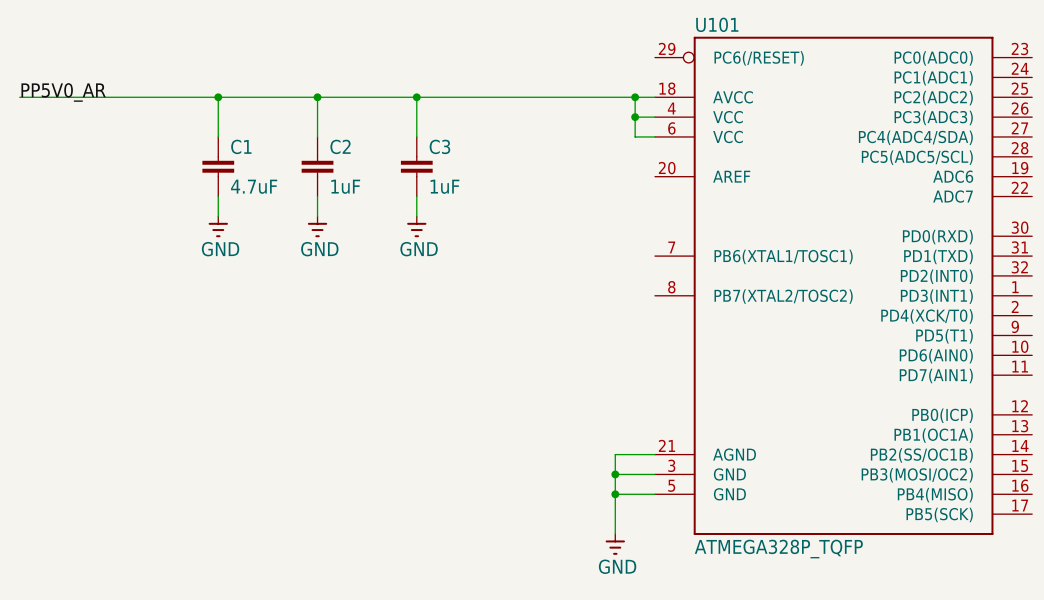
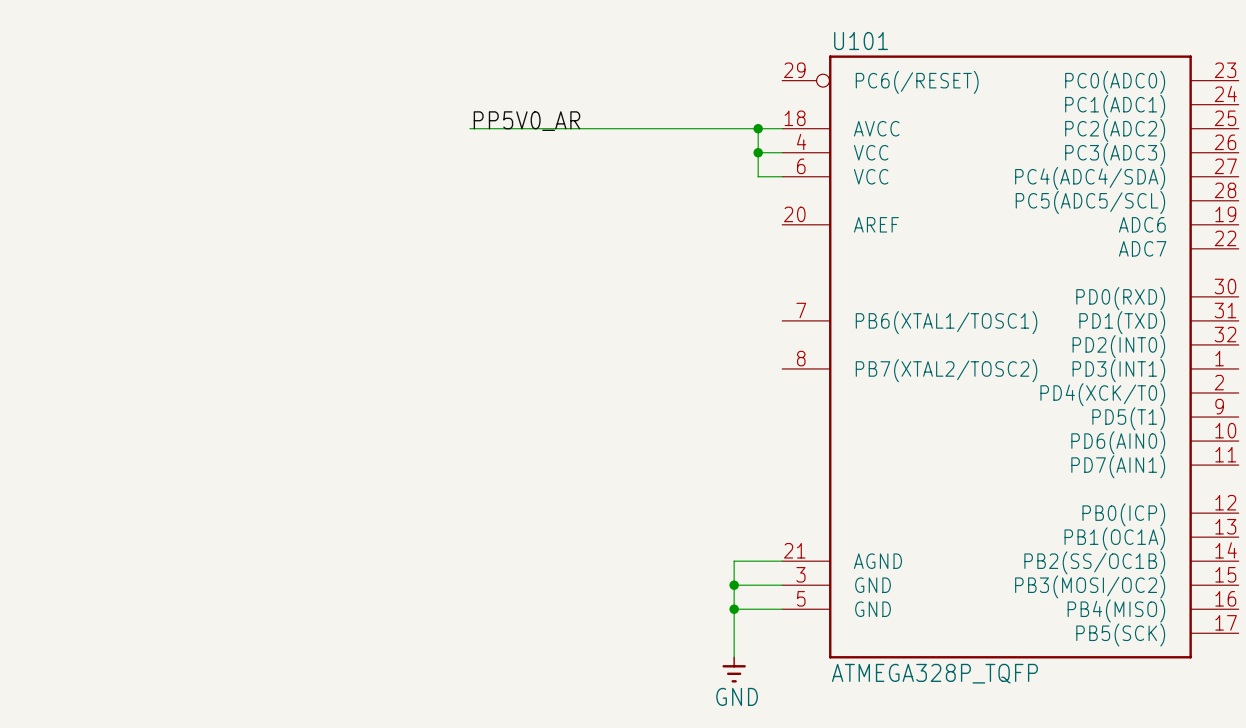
label: PP5V0_AR (63, 92) -> none
label: none -> PP5V0_AR (526, 121)
wire: (19, 97) (396, 97) -> none
wire: (218, 97) (218, 136) -> none
junction: (218, 97) -> none
wire: (317, 97) (317, 136) -> none
junction: (317, 97) -> none
wire: (416, 97) (416, 136) -> none
junction: (416, 97) -> none
C1: 4.7uF (218, 166) -> none
C2: 1uF (317, 166) -> none
C3: 1uF (416, 166) -> none
wire: (218, 196) (218, 216) -> none
wire: (317, 196) (317, 216) -> none
wire: (416, 196) (416, 216) -> none
power symbol: GND (218, 226) -> none
power symbol: GND (317, 226) -> none
power symbol: GND (416, 226) -> none

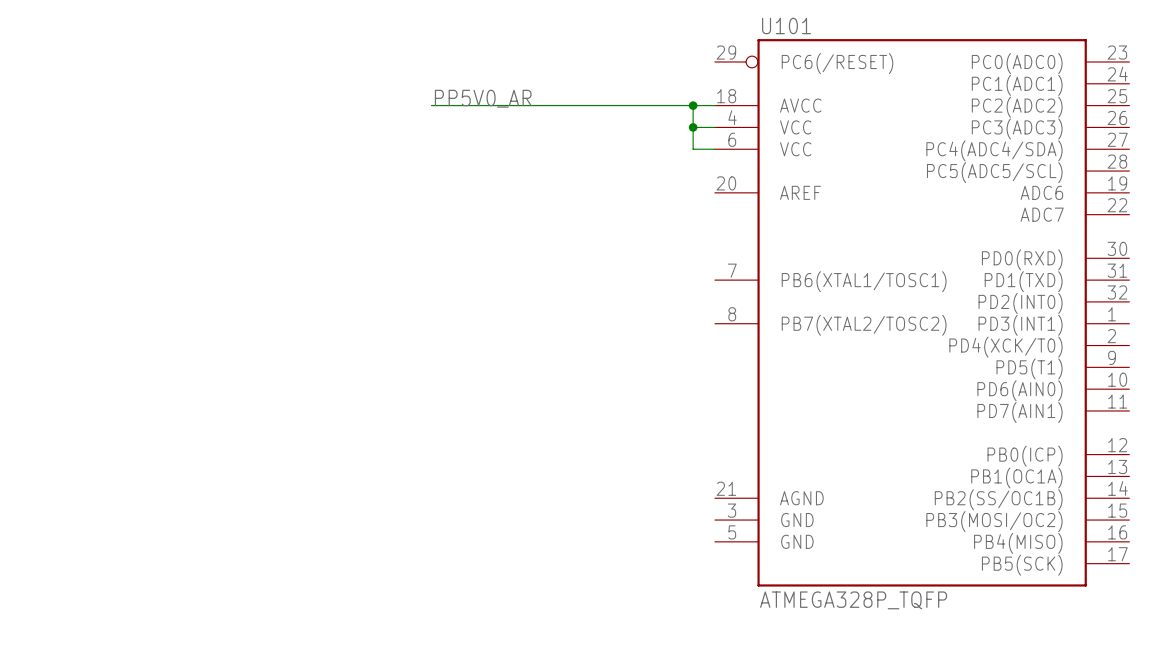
wire: (782, 561) (734, 561) (734, 657) -> none
wire: (734, 585) (782, 585) -> none
junction: (734, 585) -> none
wire: (734, 609) (782, 609) -> none
junction: (734, 609) -> none
power symbol: GND (734, 669) -> none

